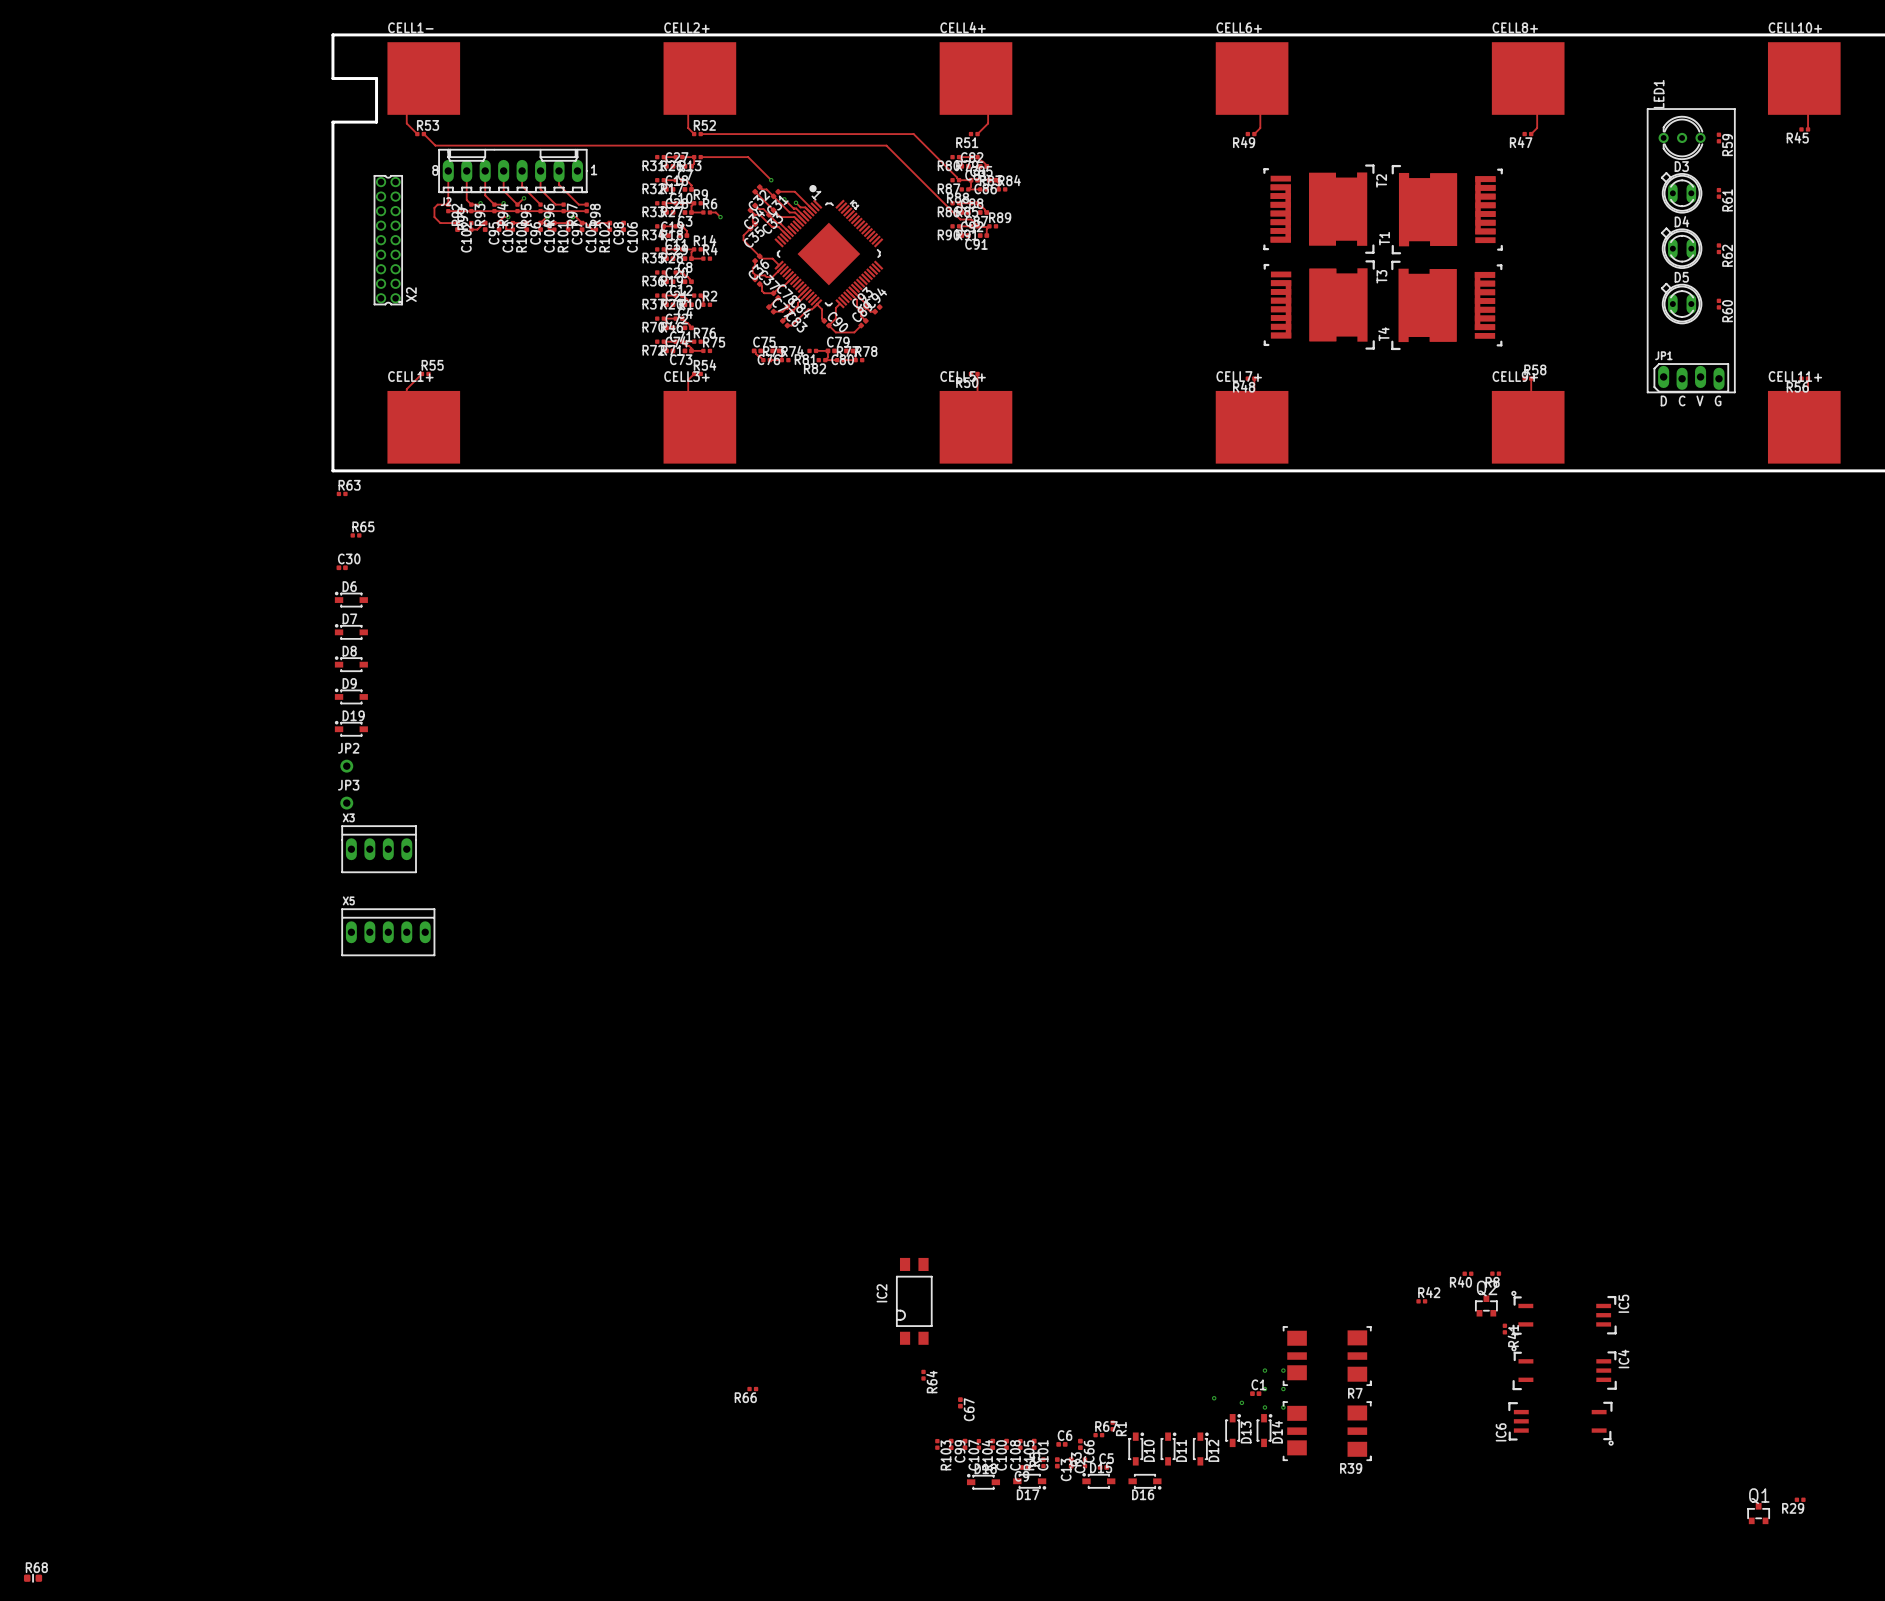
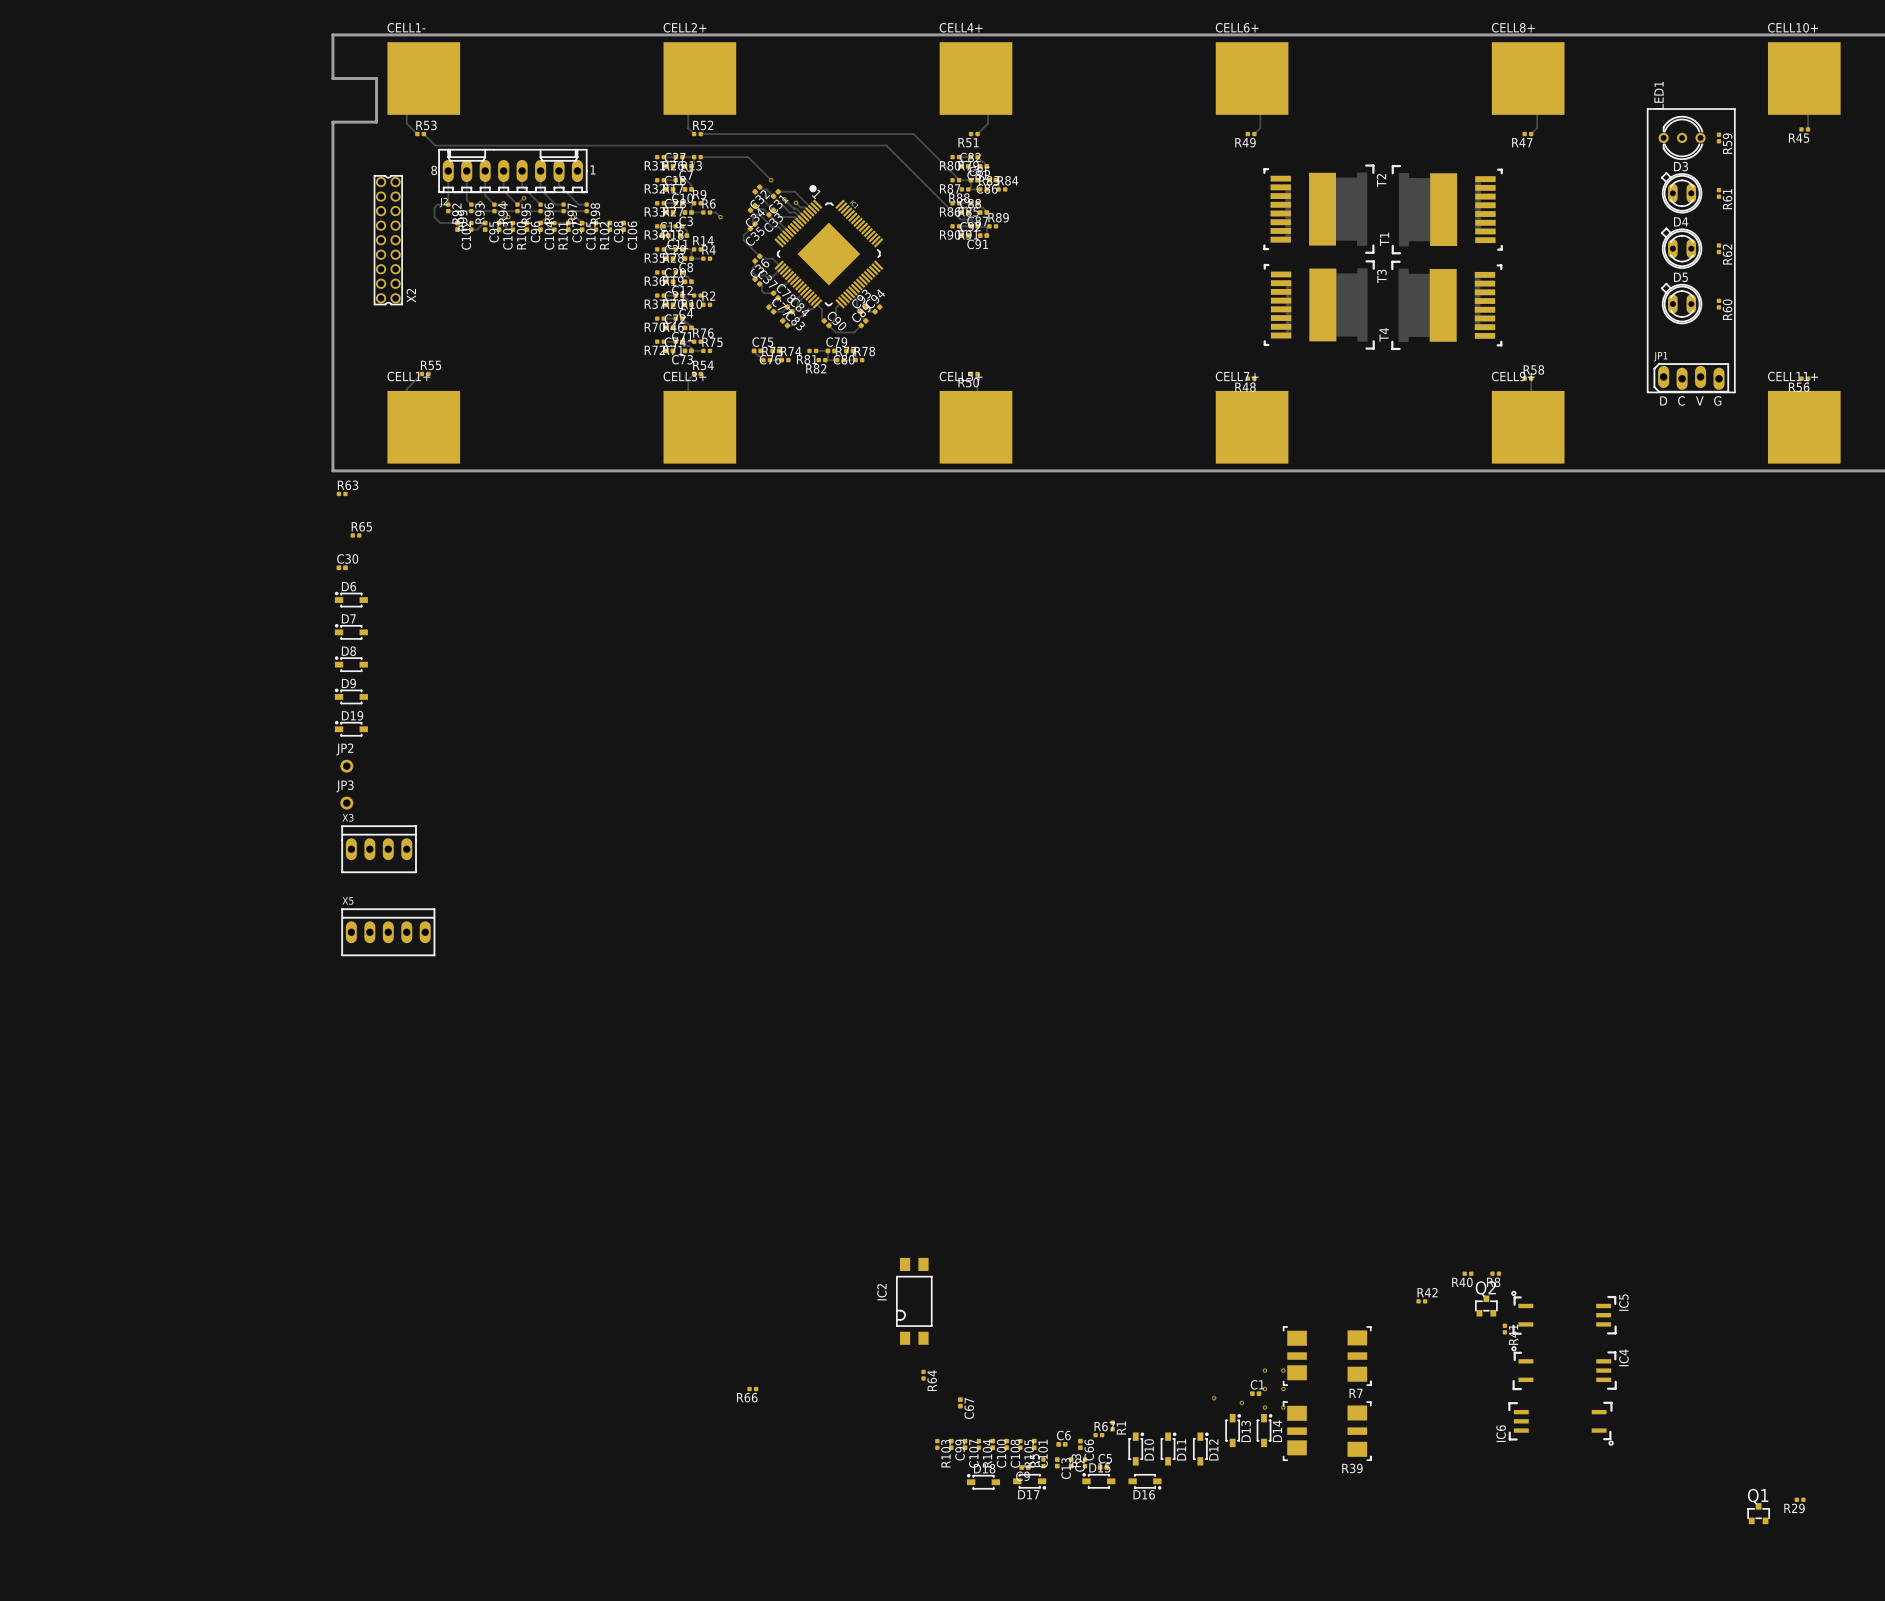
R68: (33, 1578) -> none

